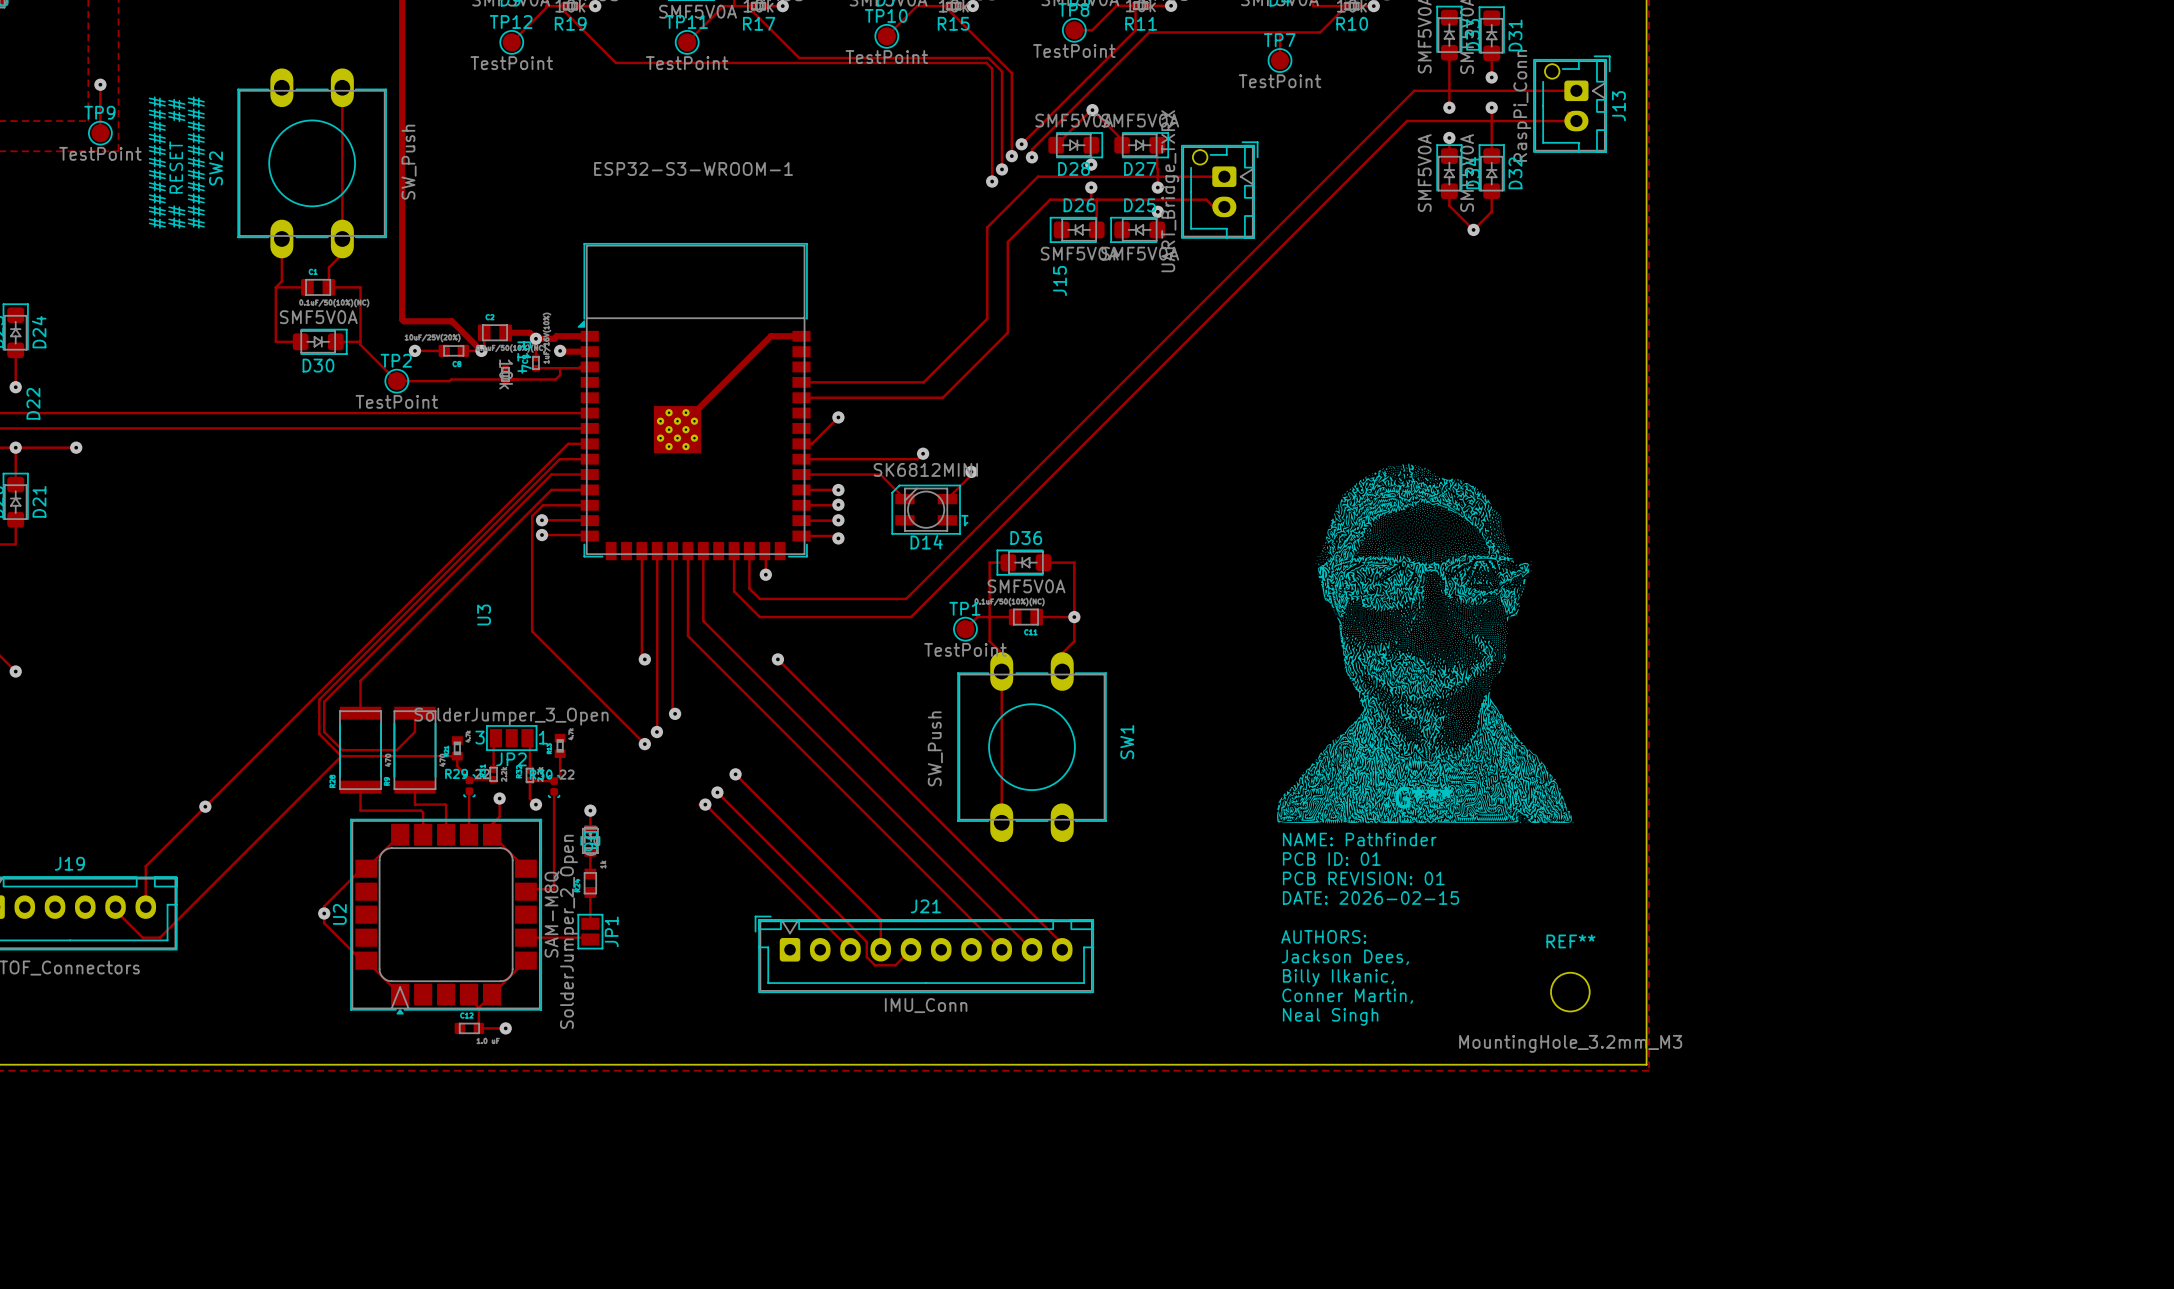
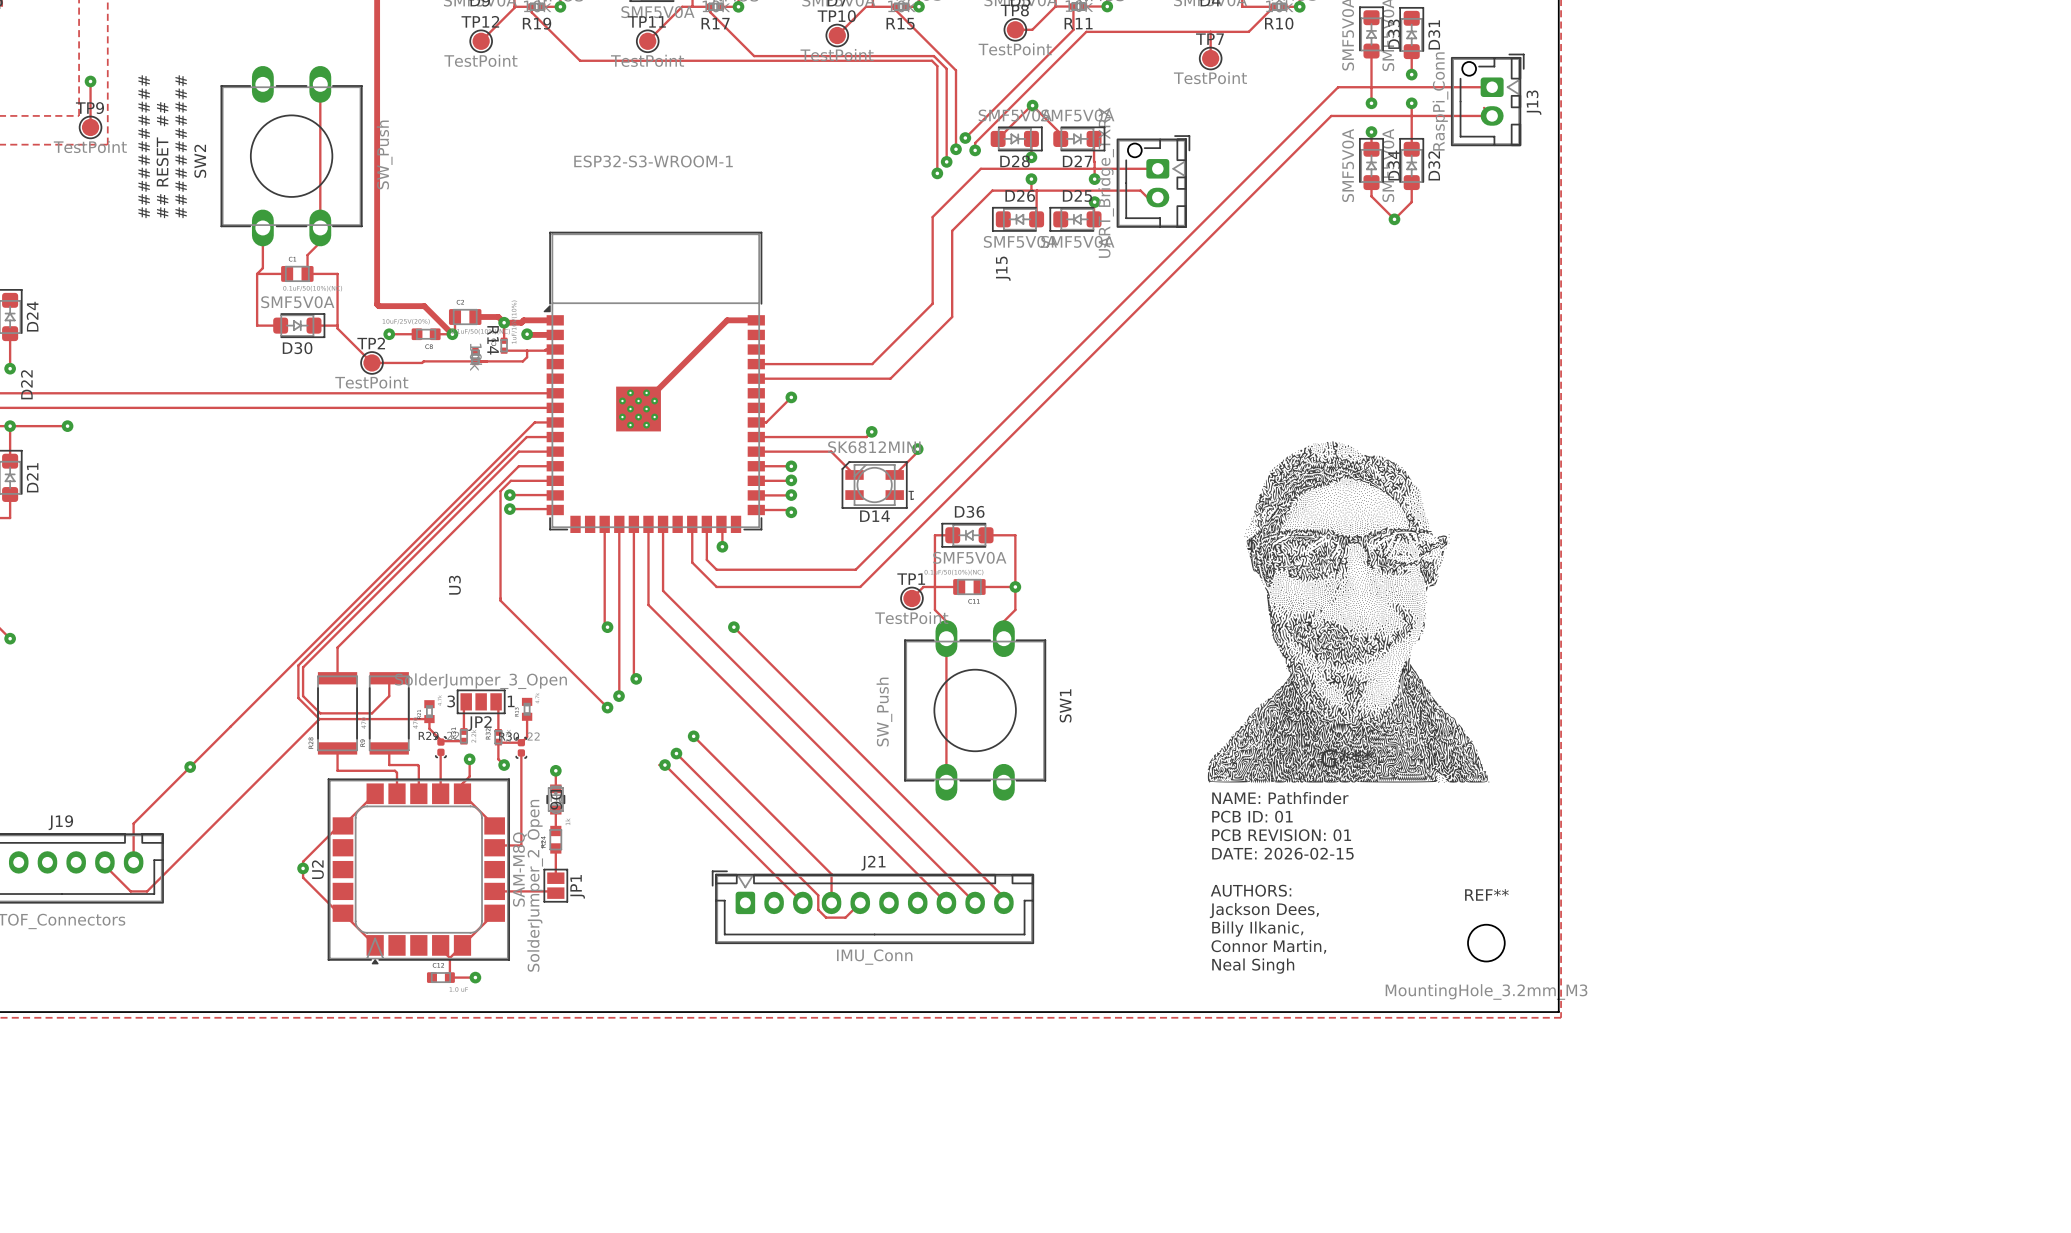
text: Conner Martin, (1347, 996) -> Connor Martin, (1268, 946)

